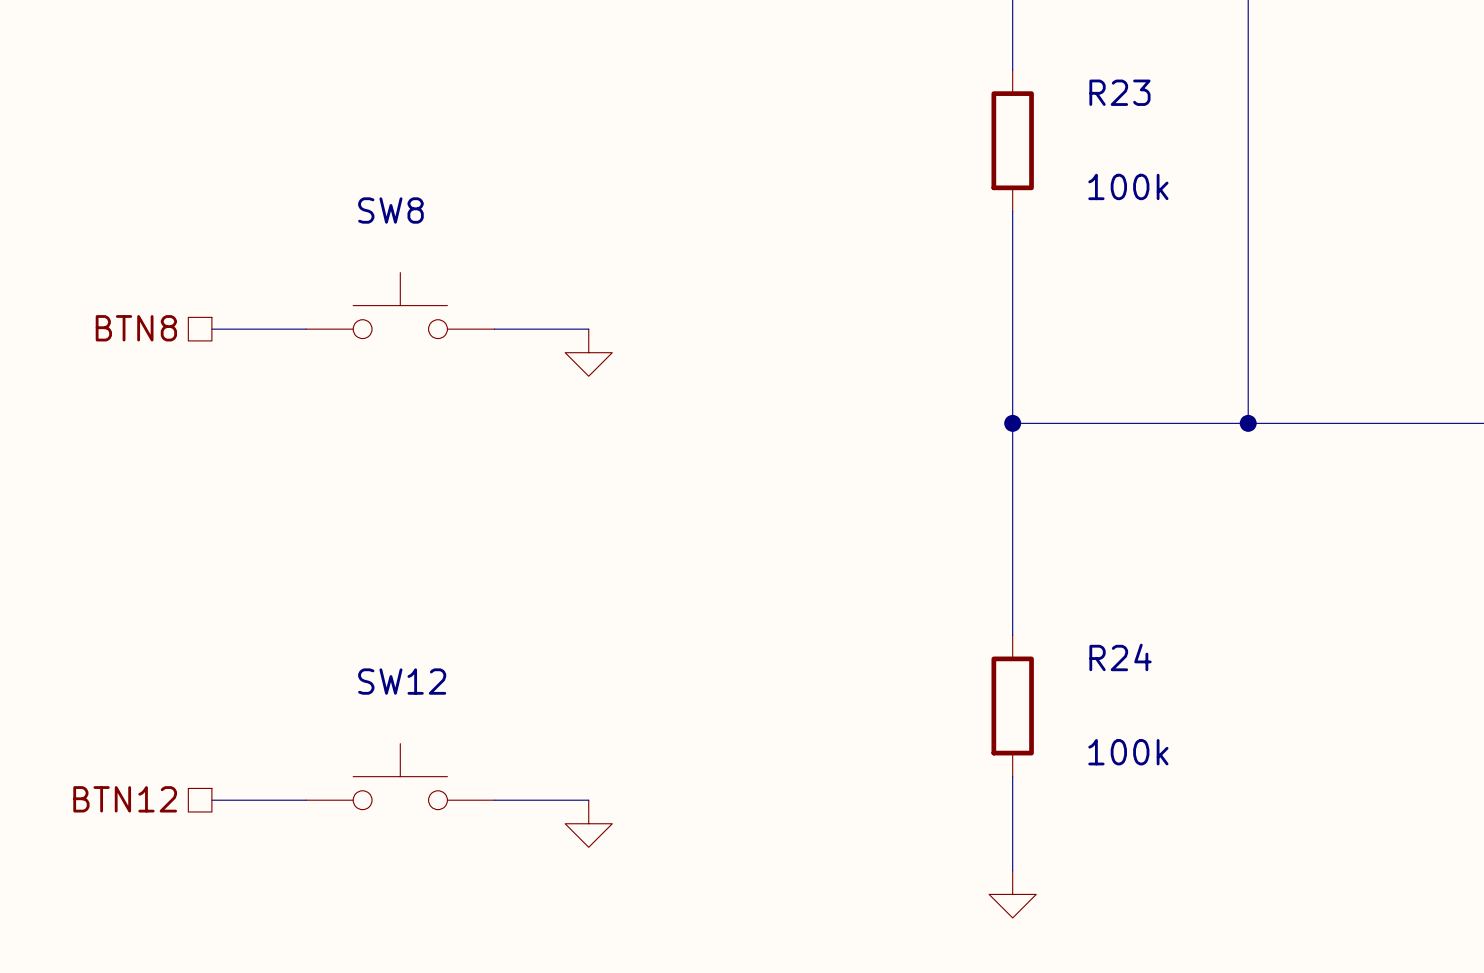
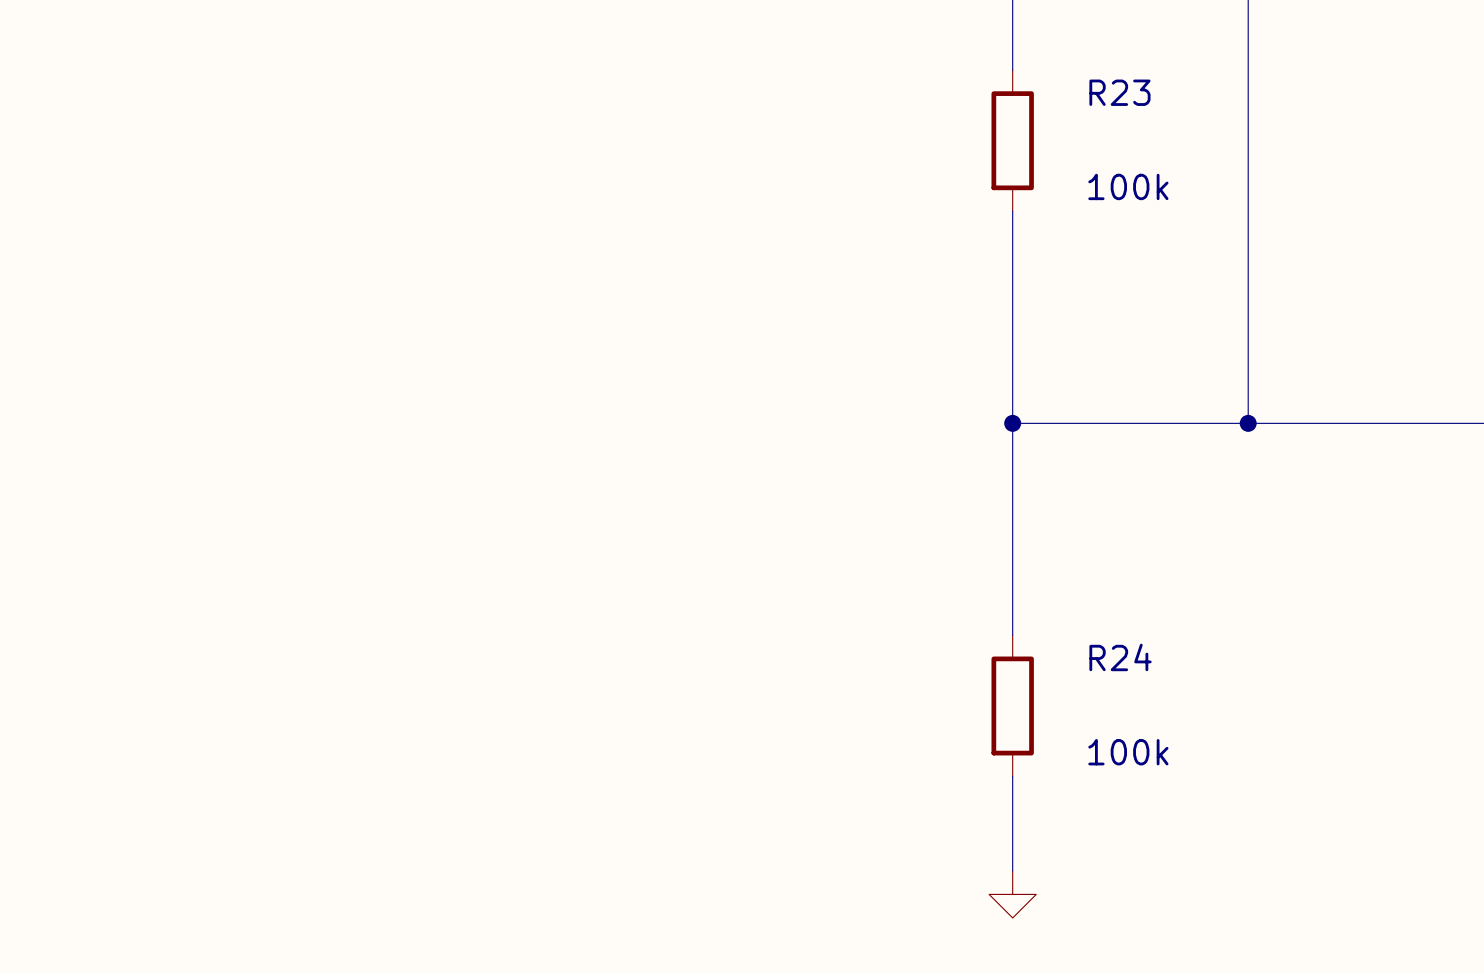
SW8: (400, 305) -> none
hierarchical label: BTN8 (136, 328) -> none
wire: (211, 329) (306, 329) -> none
wire: (494, 329) (588, 329) -> none
power symbol: (588, 352) -> none
SW12: (400, 776) -> none
hierarchical label: BTN12 (125, 799) -> none
wire: (211, 800) (306, 800) -> none
wire: (494, 800) (588, 800) -> none
power symbol: (588, 823) -> none

